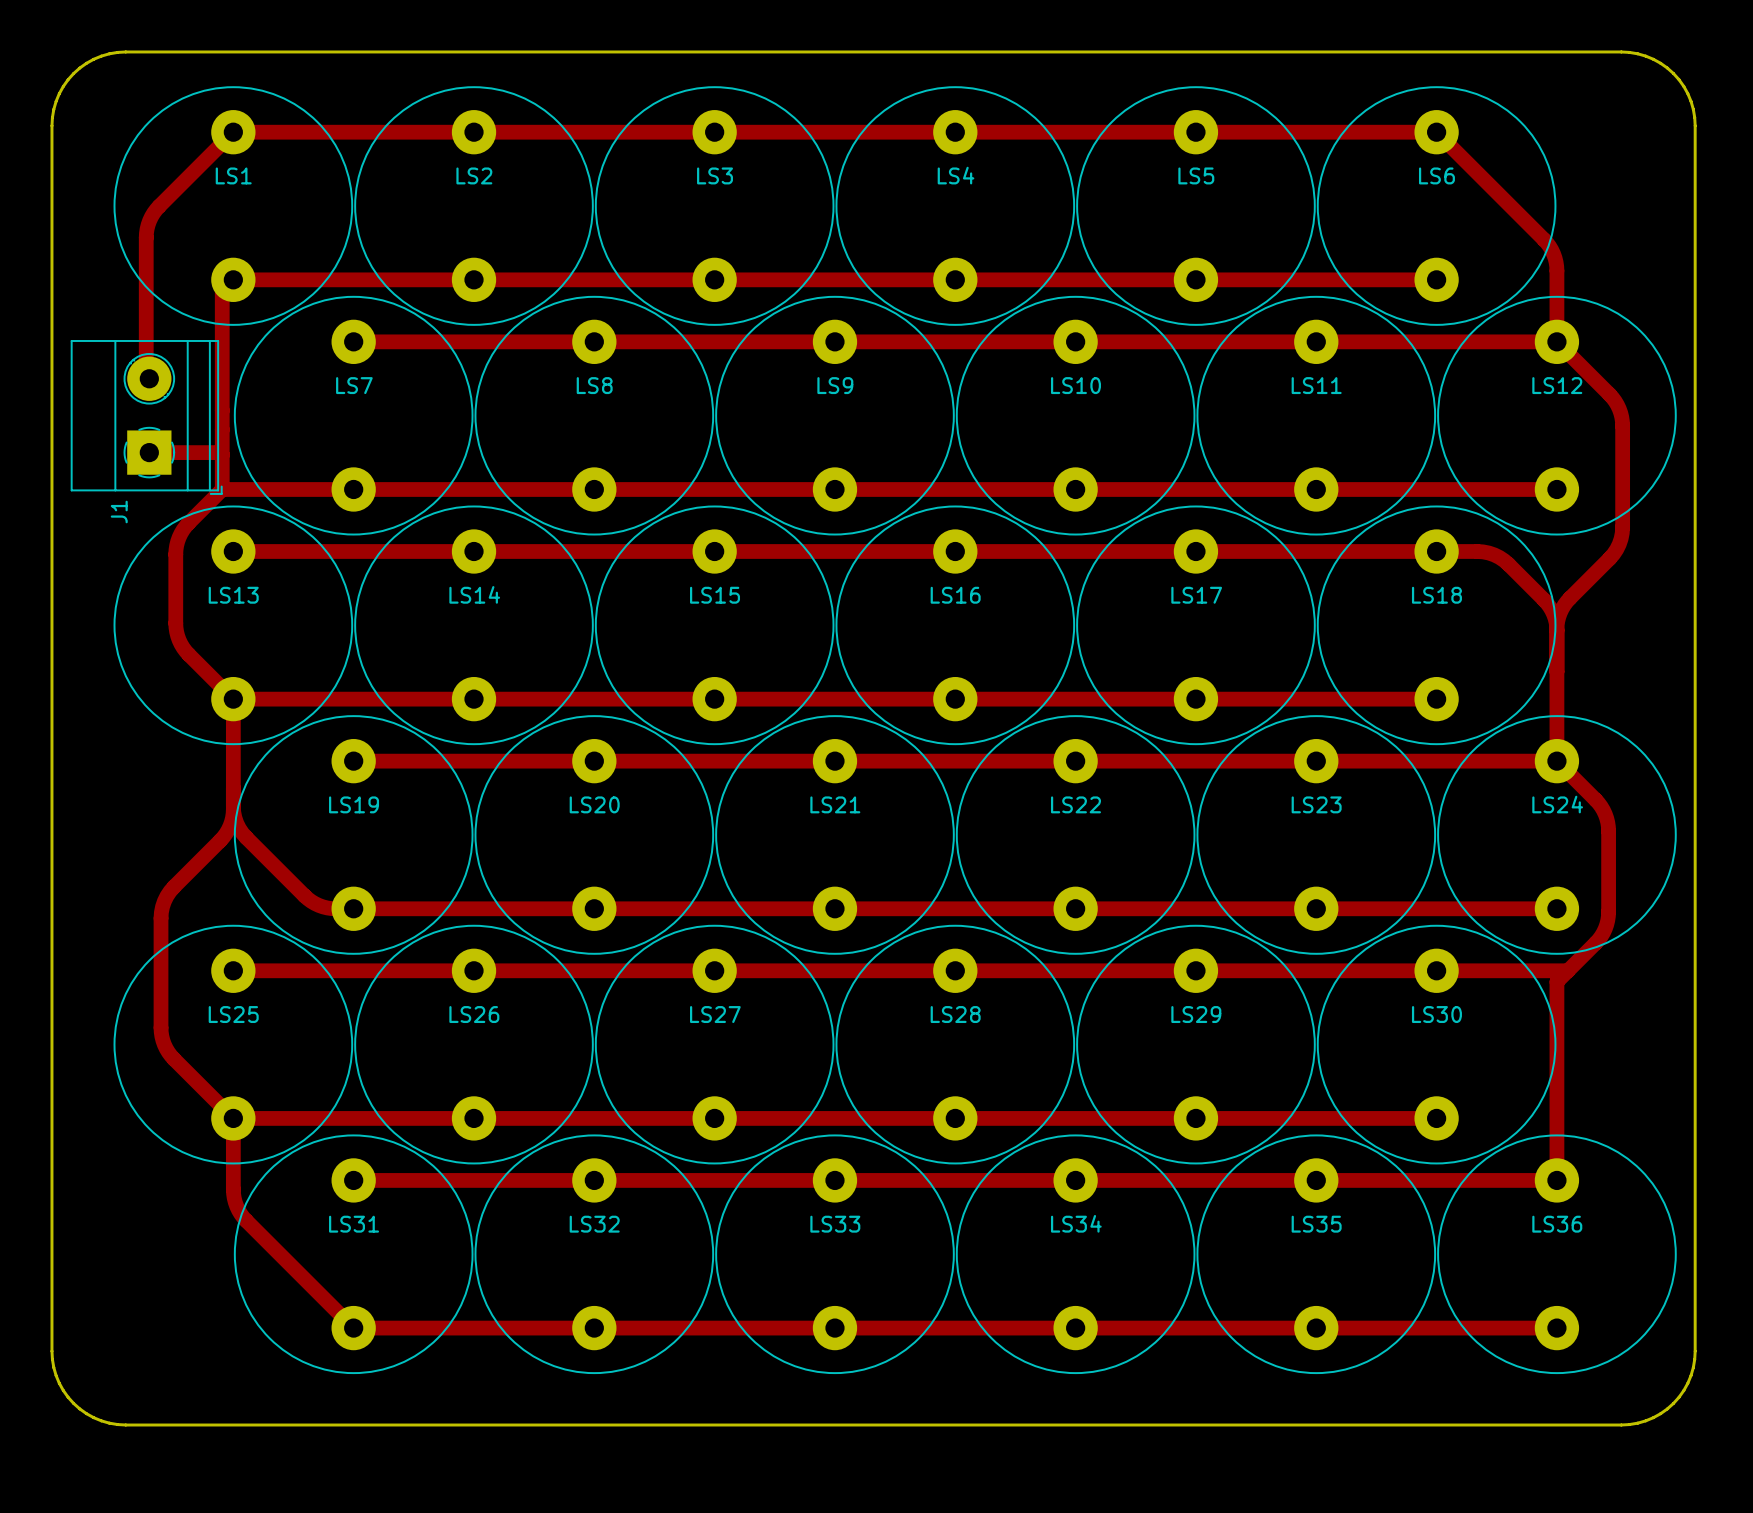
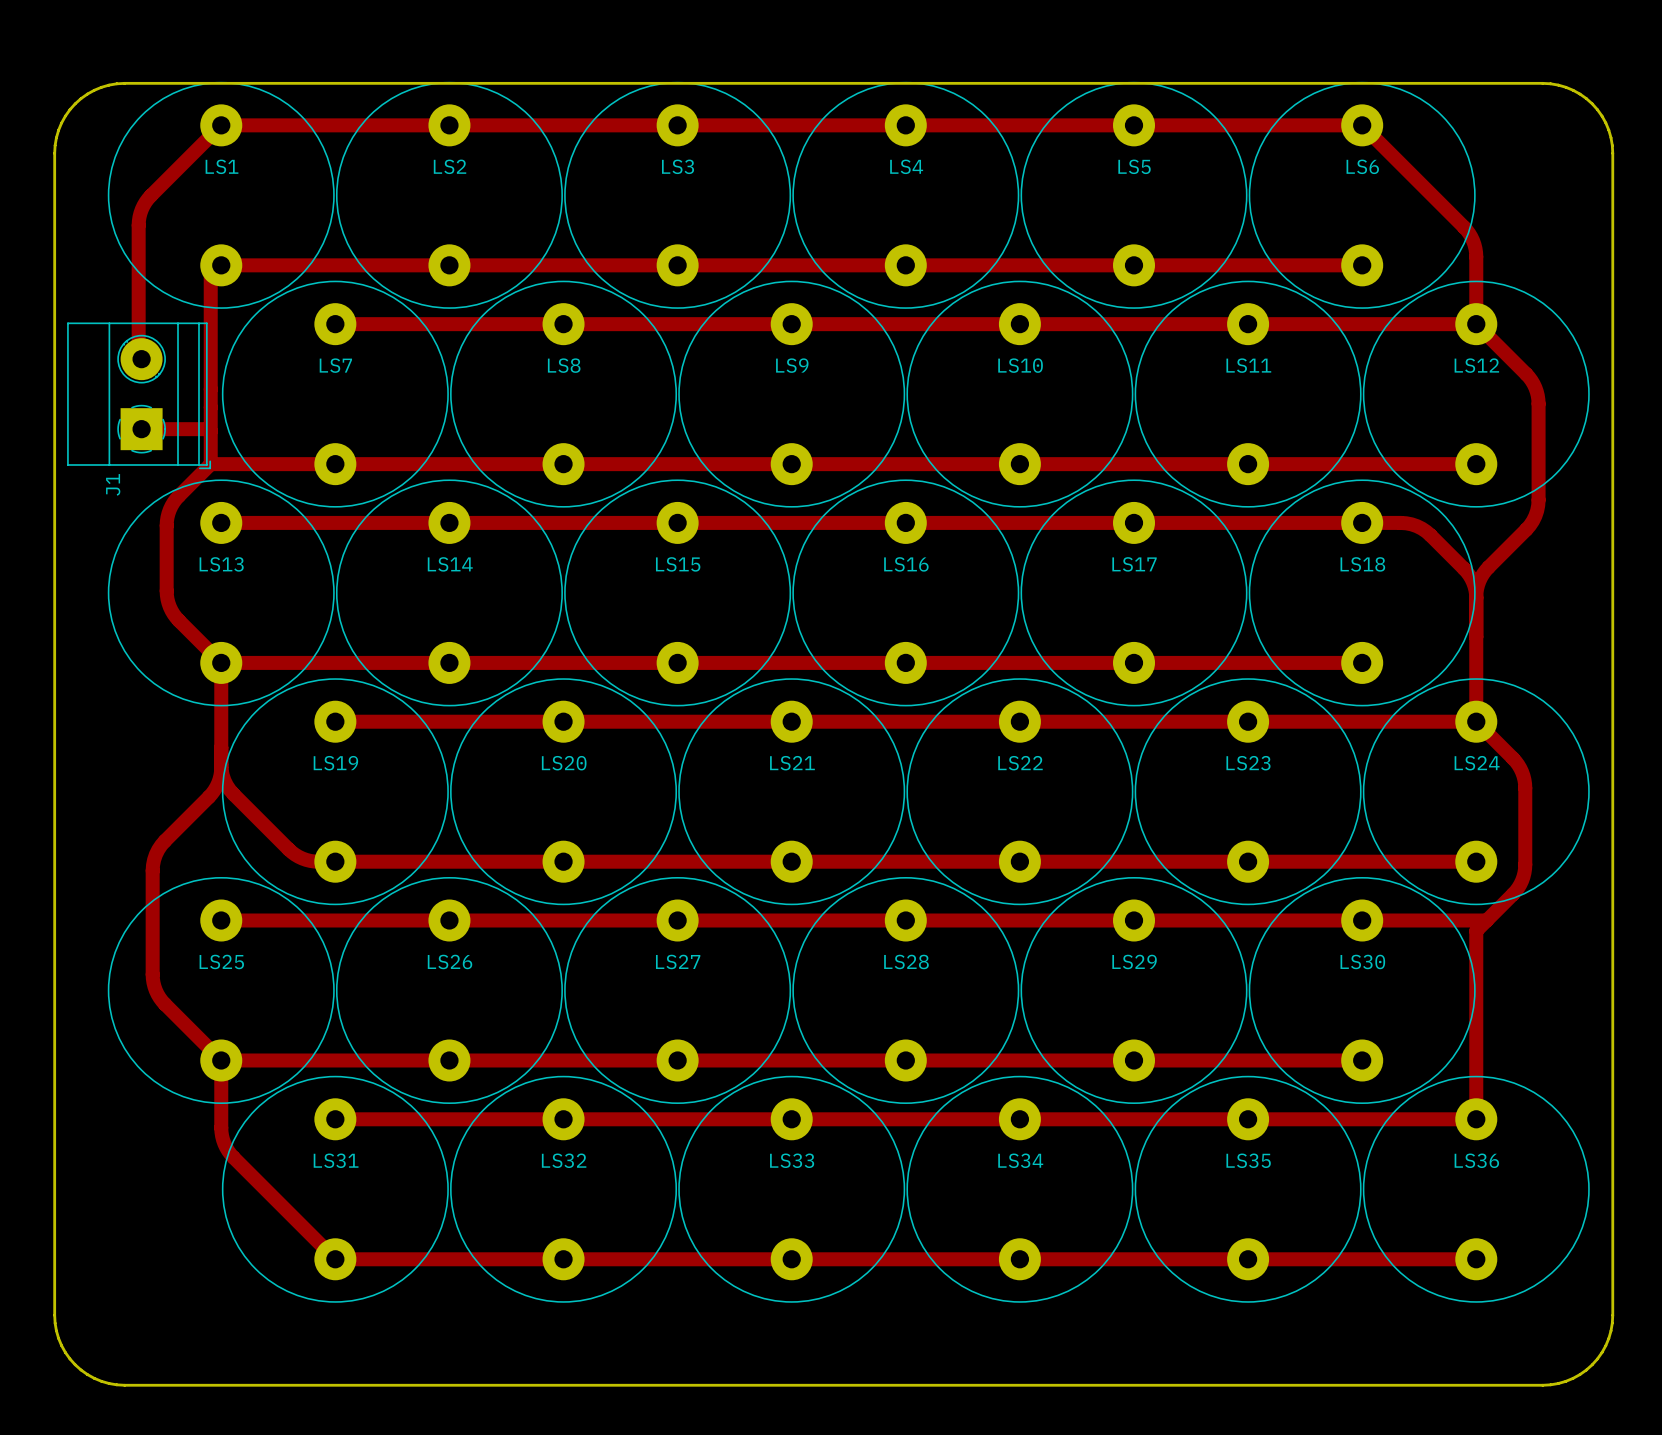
board edge: (125, 51) (1621, 51) (1645, 56) (1667, 68) (1679, 79) (1687, 93) (1693, 109) (1695, 125) (1695, 1351) (1691, 1375) (1679, 1397) (1667, 1408) (1653, 1417) (1637, 1423) (1621, 1425) (125, 1425) (101, 1420) (79, 1408) (68, 1397) (59, 1383) (53, 1367) (51, 1351) (51, 125) (53, 109) (59, 93) (73, 73) (86, 63) (101, 56) (125, 51) -> (124, 83) (1542, 83) (1565, 87) (1586, 98) (1597, 109) (1605, 122) (1611, 137) (1612, 153) (1612, 1315) (1608, 1338) (1597, 1358) (1586, 1370) (1573, 1378) (1558, 1383) (1542, 1385) (124, 1385) (101, 1381) (81, 1370) (69, 1358) (61, 1345) (56, 1330) (54, 1315) (54, 153) (58, 130) (65, 116) (75, 103) (87, 94) (101, 87) (124, 83)

